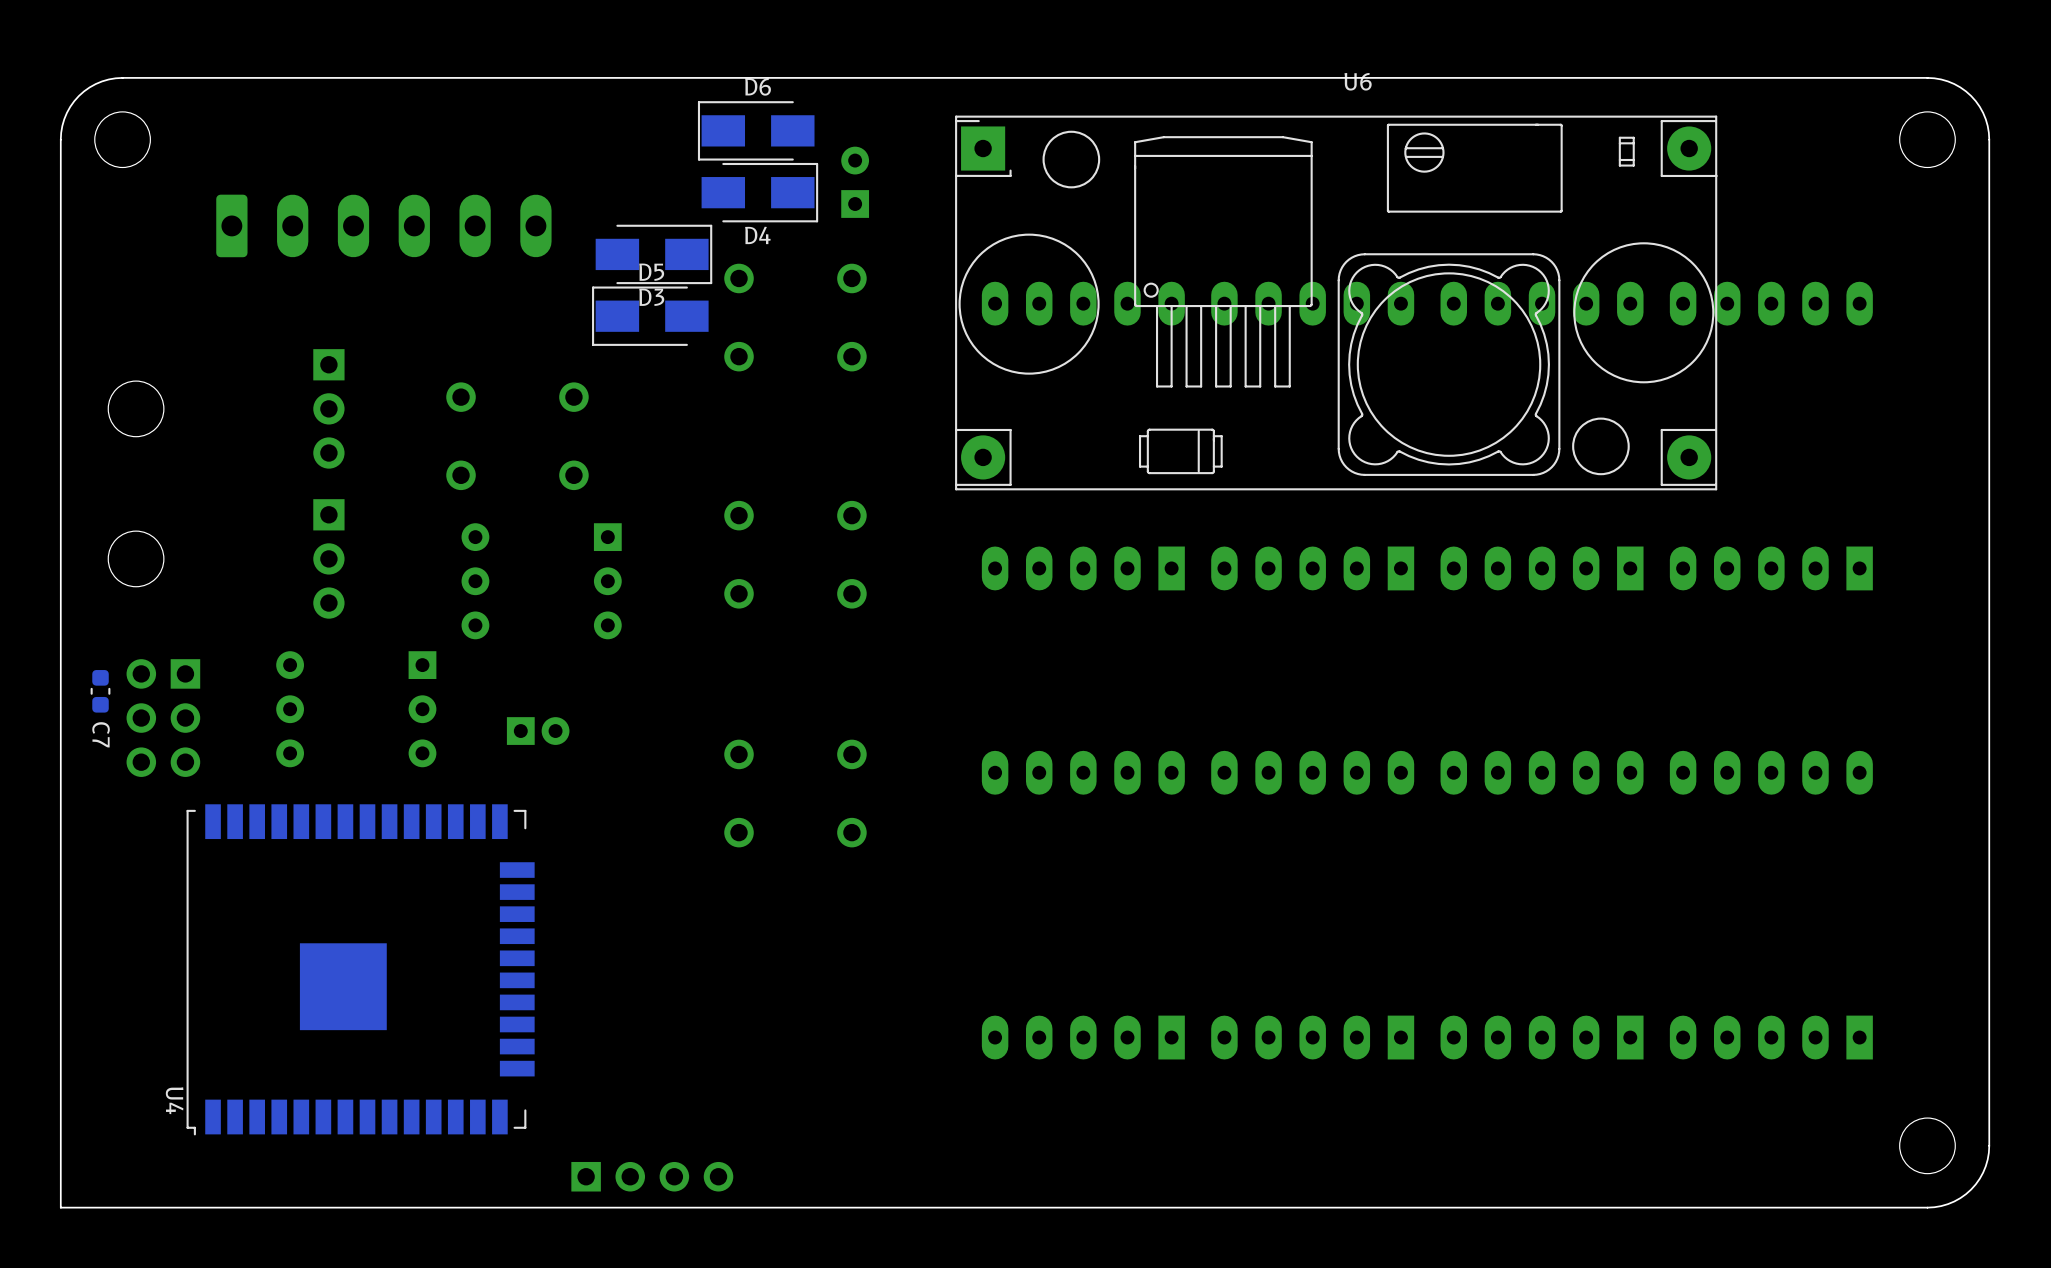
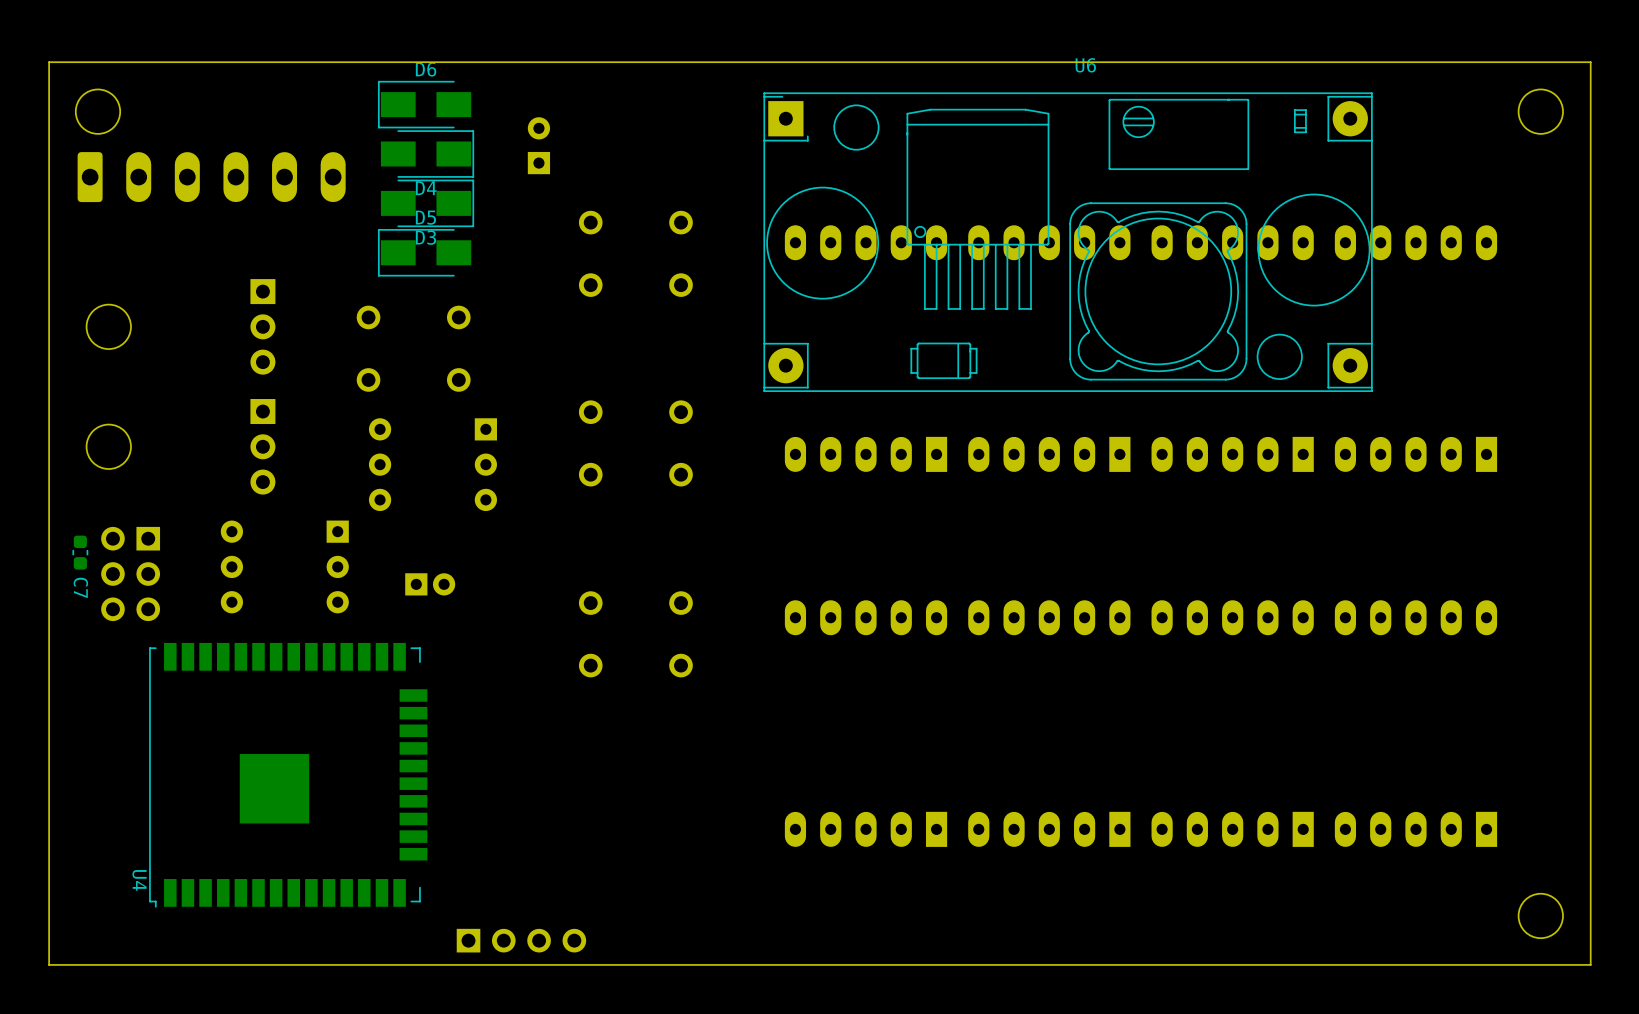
board edge: (1927, 77) (122, 77) (108, 79) (89, 87) (78, 96) (70, 106) (64, 119) (60, 139) (60, 1207) (1927, 1207) (1941, 1206) (1960, 1198) (1975, 1184) (1983, 1172) (1987, 1159) (1989, 1145) (1989, 139) (1985, 119) (1979, 106) (1971, 96) (1960, 87) (1947, 81) (1927, 77) -> (1590, 62) (1590, 964) (49, 964) (49, 62) (1590, 62)
D6 position: (756, 130) -> (424, 104)
part position: (855, 182) -> (538, 145)
D4 position: (759, 192) -> (427, 154)
part position: (383, 225) -> (211, 177)
D3 position: (653, 254) -> (427, 203)
D5 position: (650, 316) -> (424, 252)

